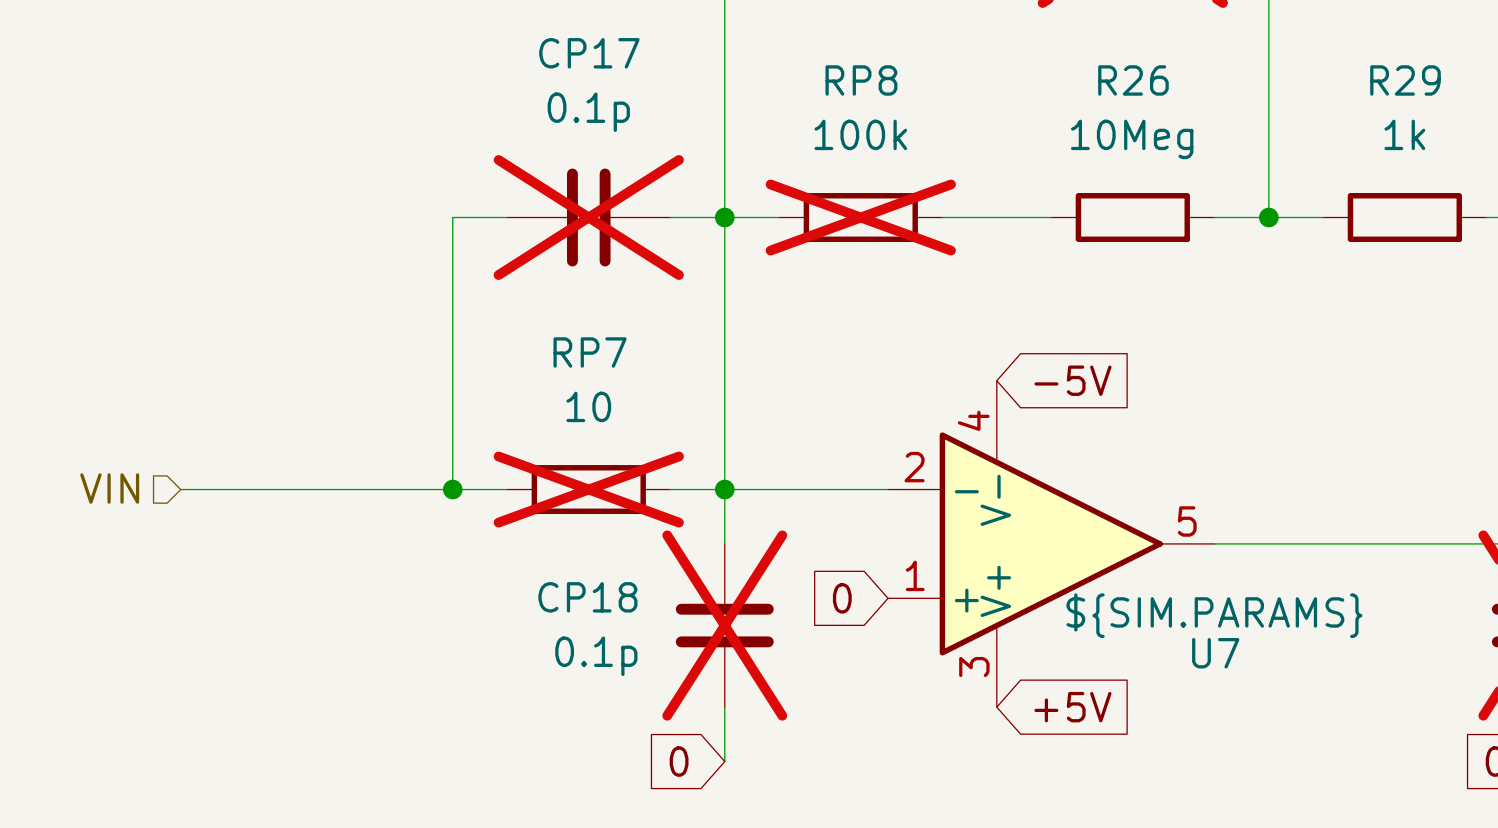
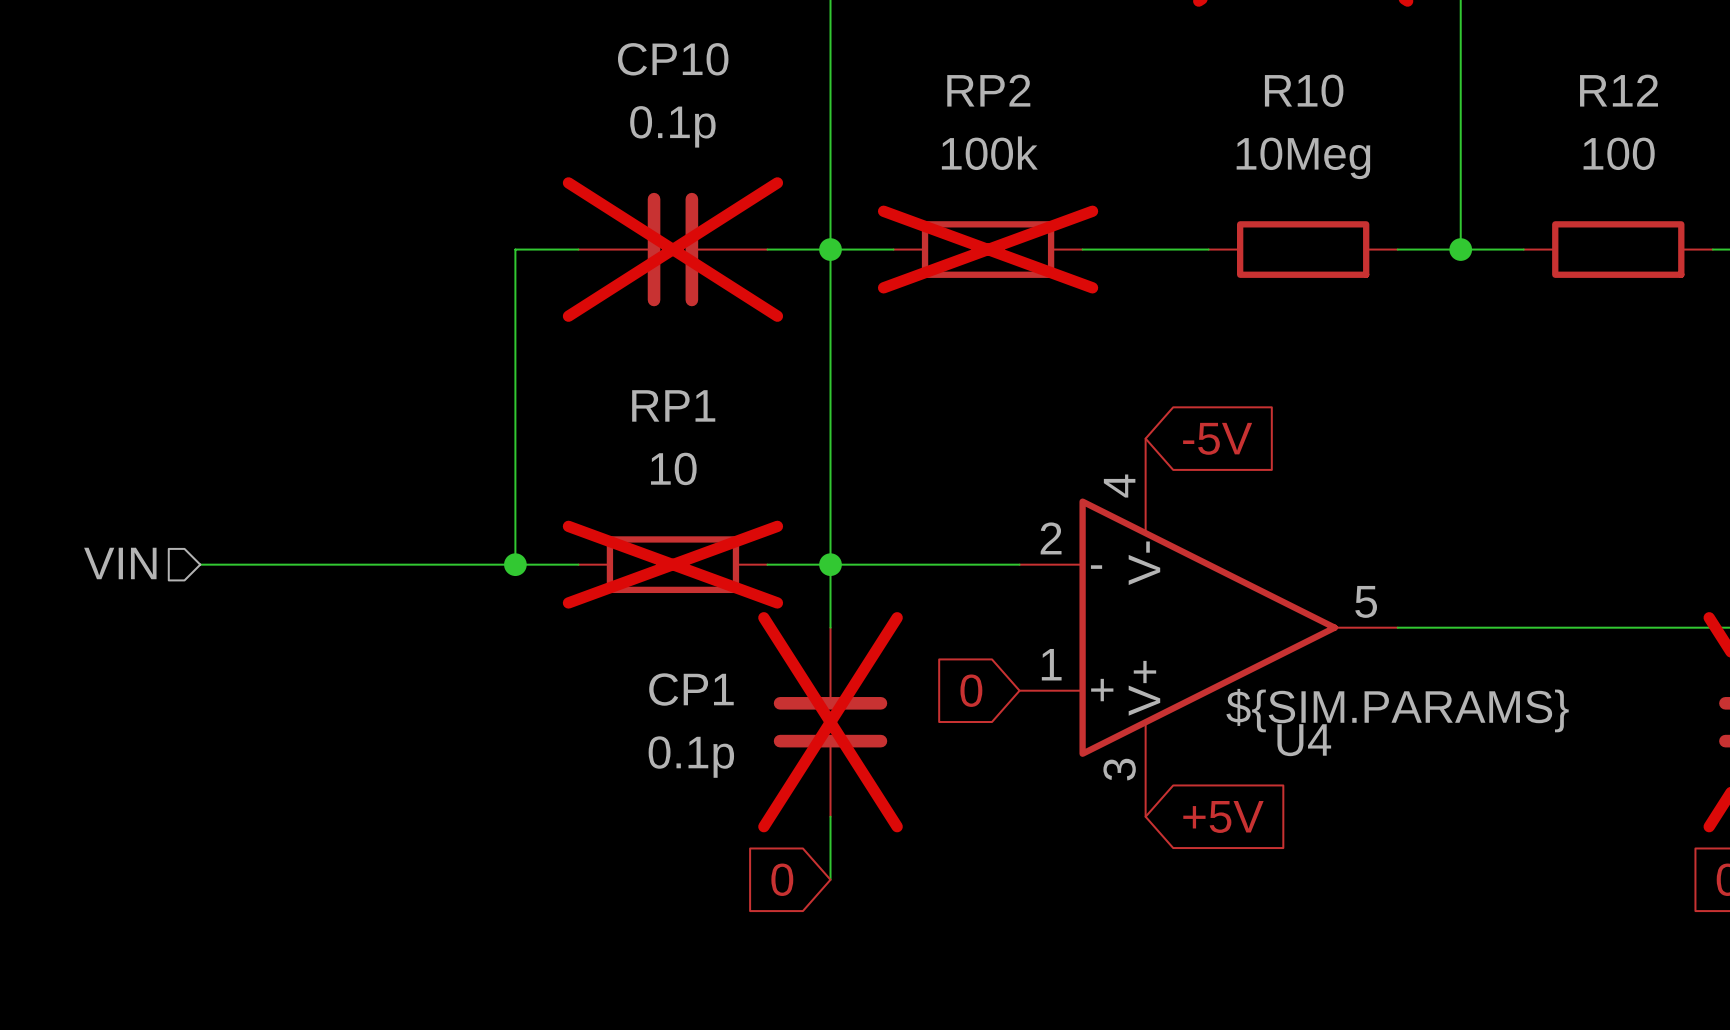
CP17 name: CP17 (589, 53) -> CP10 (673, 59)
RP8 name: RP8 (861, 80) -> RP2 (988, 90)
R26 name: R26 (1133, 80) -> R10 (1304, 90)
R29 name: R29 (1405, 80) -> R12 (1619, 90)
R29 value: 1k (1404, 134) -> 100 (1619, 153)
RP7 name: RP7 (590, 352) -> RP1 (673, 405)
CP18 name: CP18 (587, 597) -> CP1 (691, 689)
U7 name: U7 (1215, 653) -> U4 (1304, 740)

